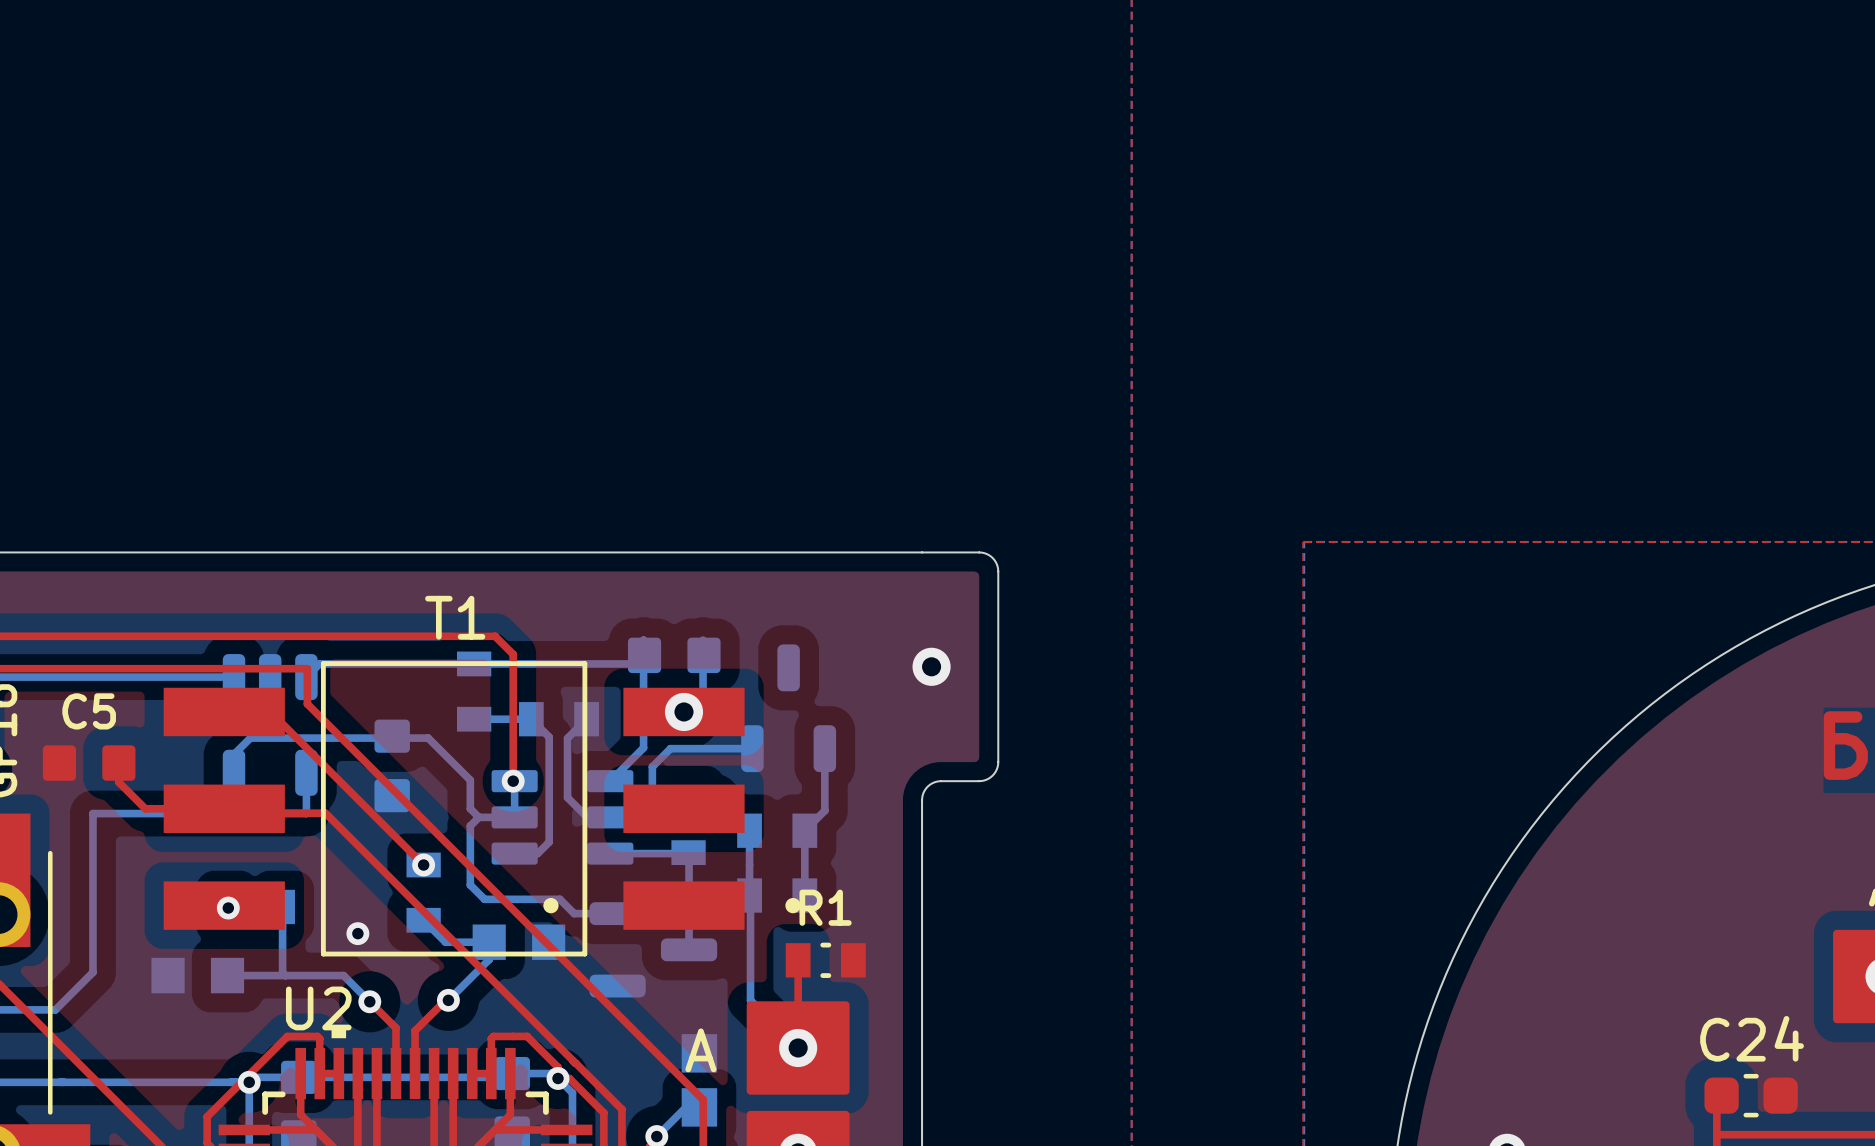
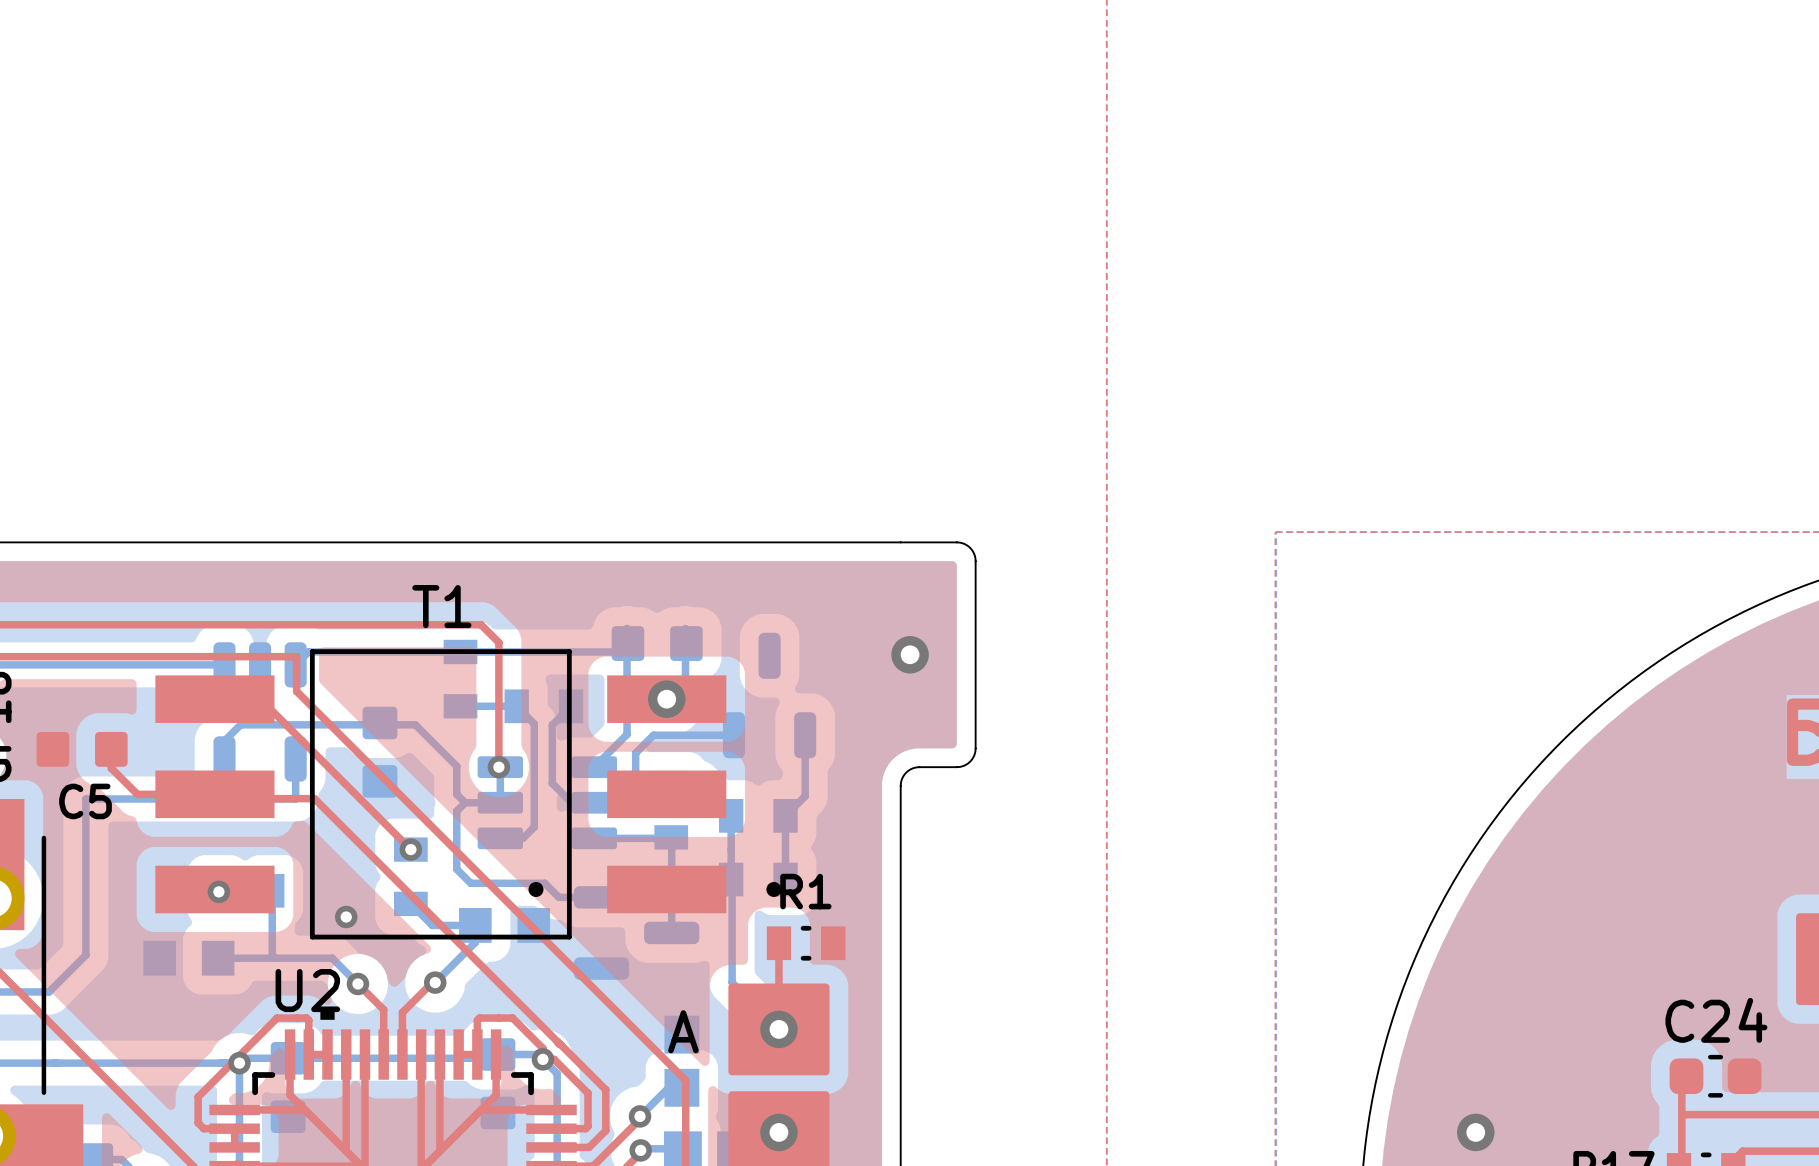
C5 name position: C5 (89, 711) -> C5 (85, 801)

